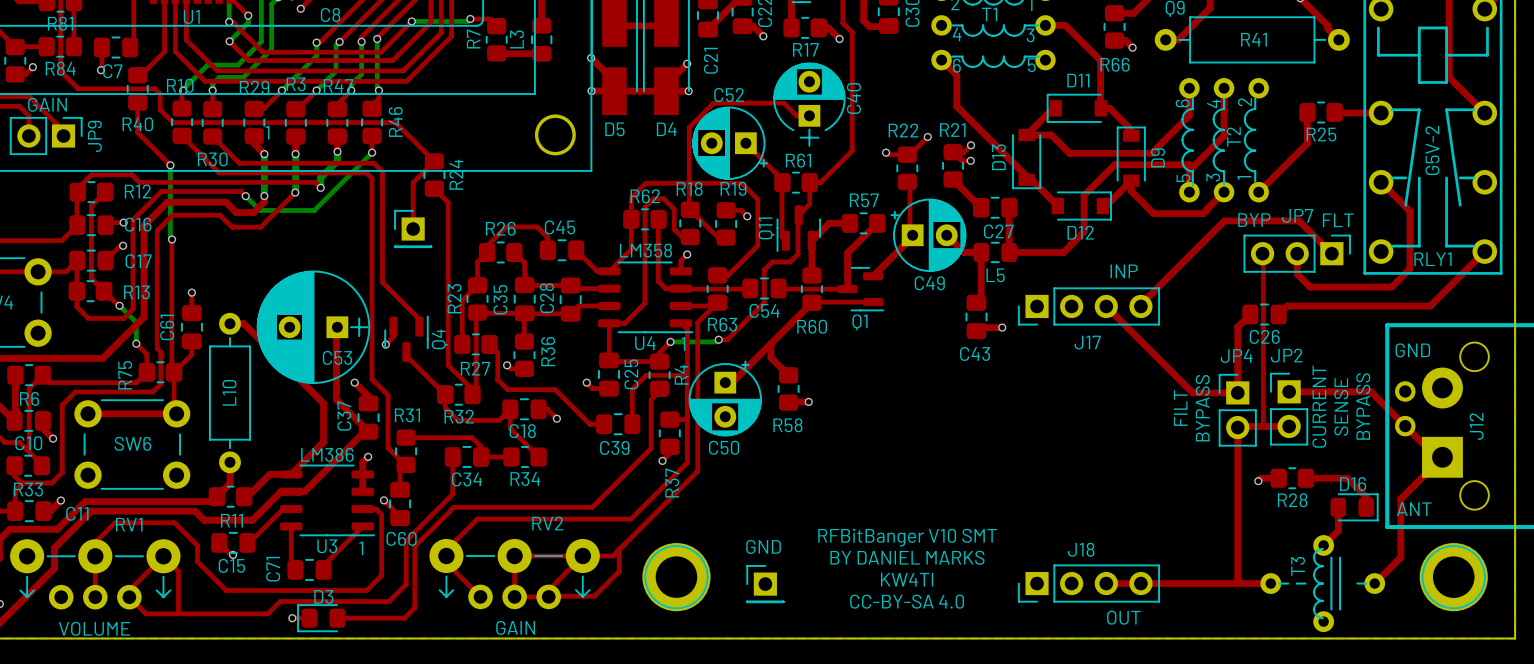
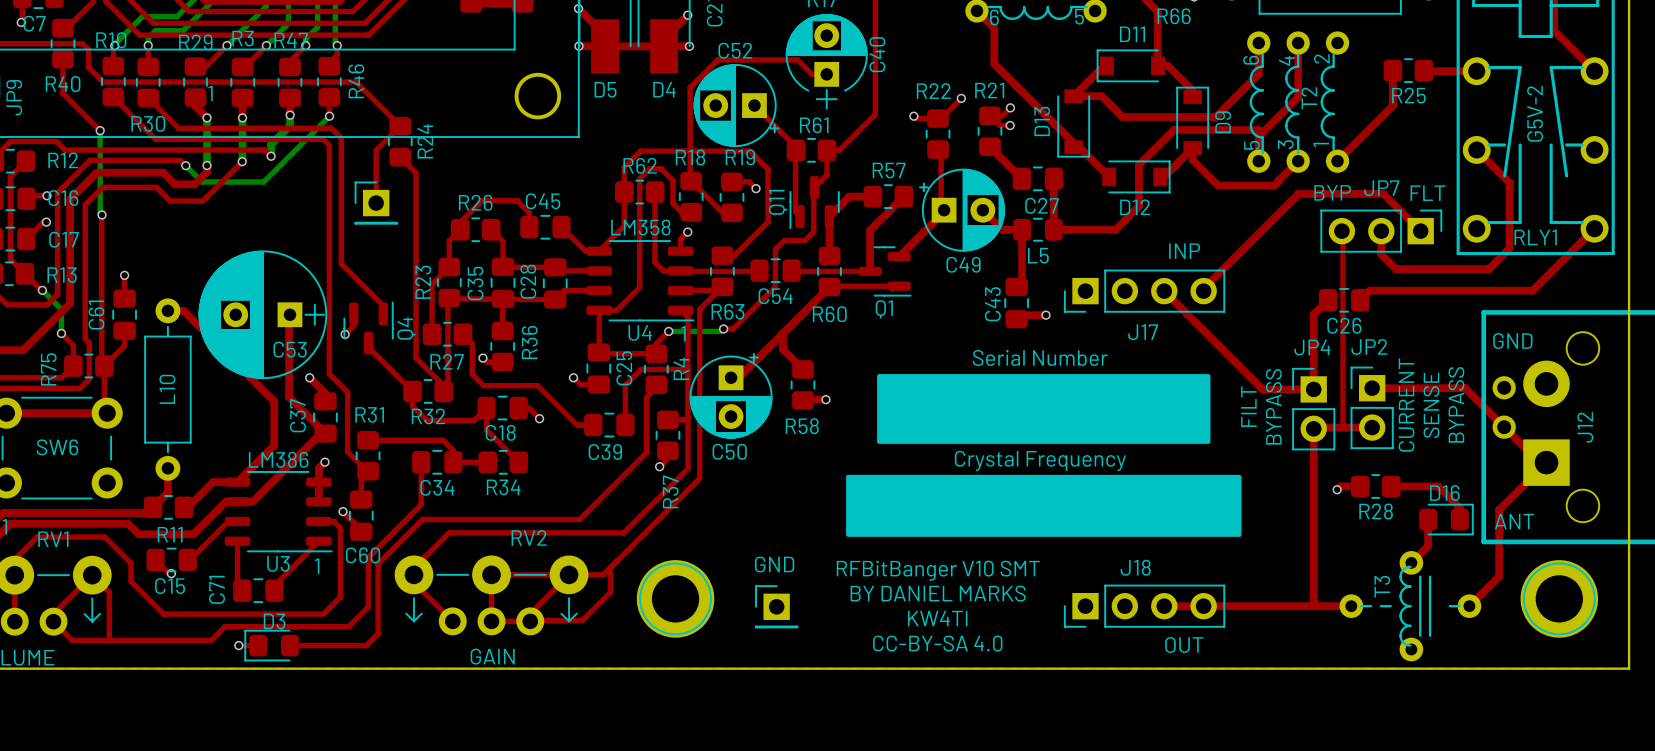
C43 name rotation: 0° (975, 353) -> 90° counterclockwise (992, 304)
text: none -> Serial Number (1040, 357)
drawing: none -> [877, 374, 1211, 444]
text: none -> Crystal Frequency (1040, 460)
drawing: none -> [846, 474, 1242, 537]
text: RFBitBanger V10 SMT (907, 537) -> none
text: BY DANIEL MARKS (907, 557) -> RFBitBanger V10 SMT (938, 570)
text: KW4TI (907, 579) -> BY DANIEL MARKS (938, 593)
text: CC-BY-SA 4.0 (907, 601) -> KW4TI (937, 618)
text: none -> CC-BY-SA 4.0 (937, 643)

